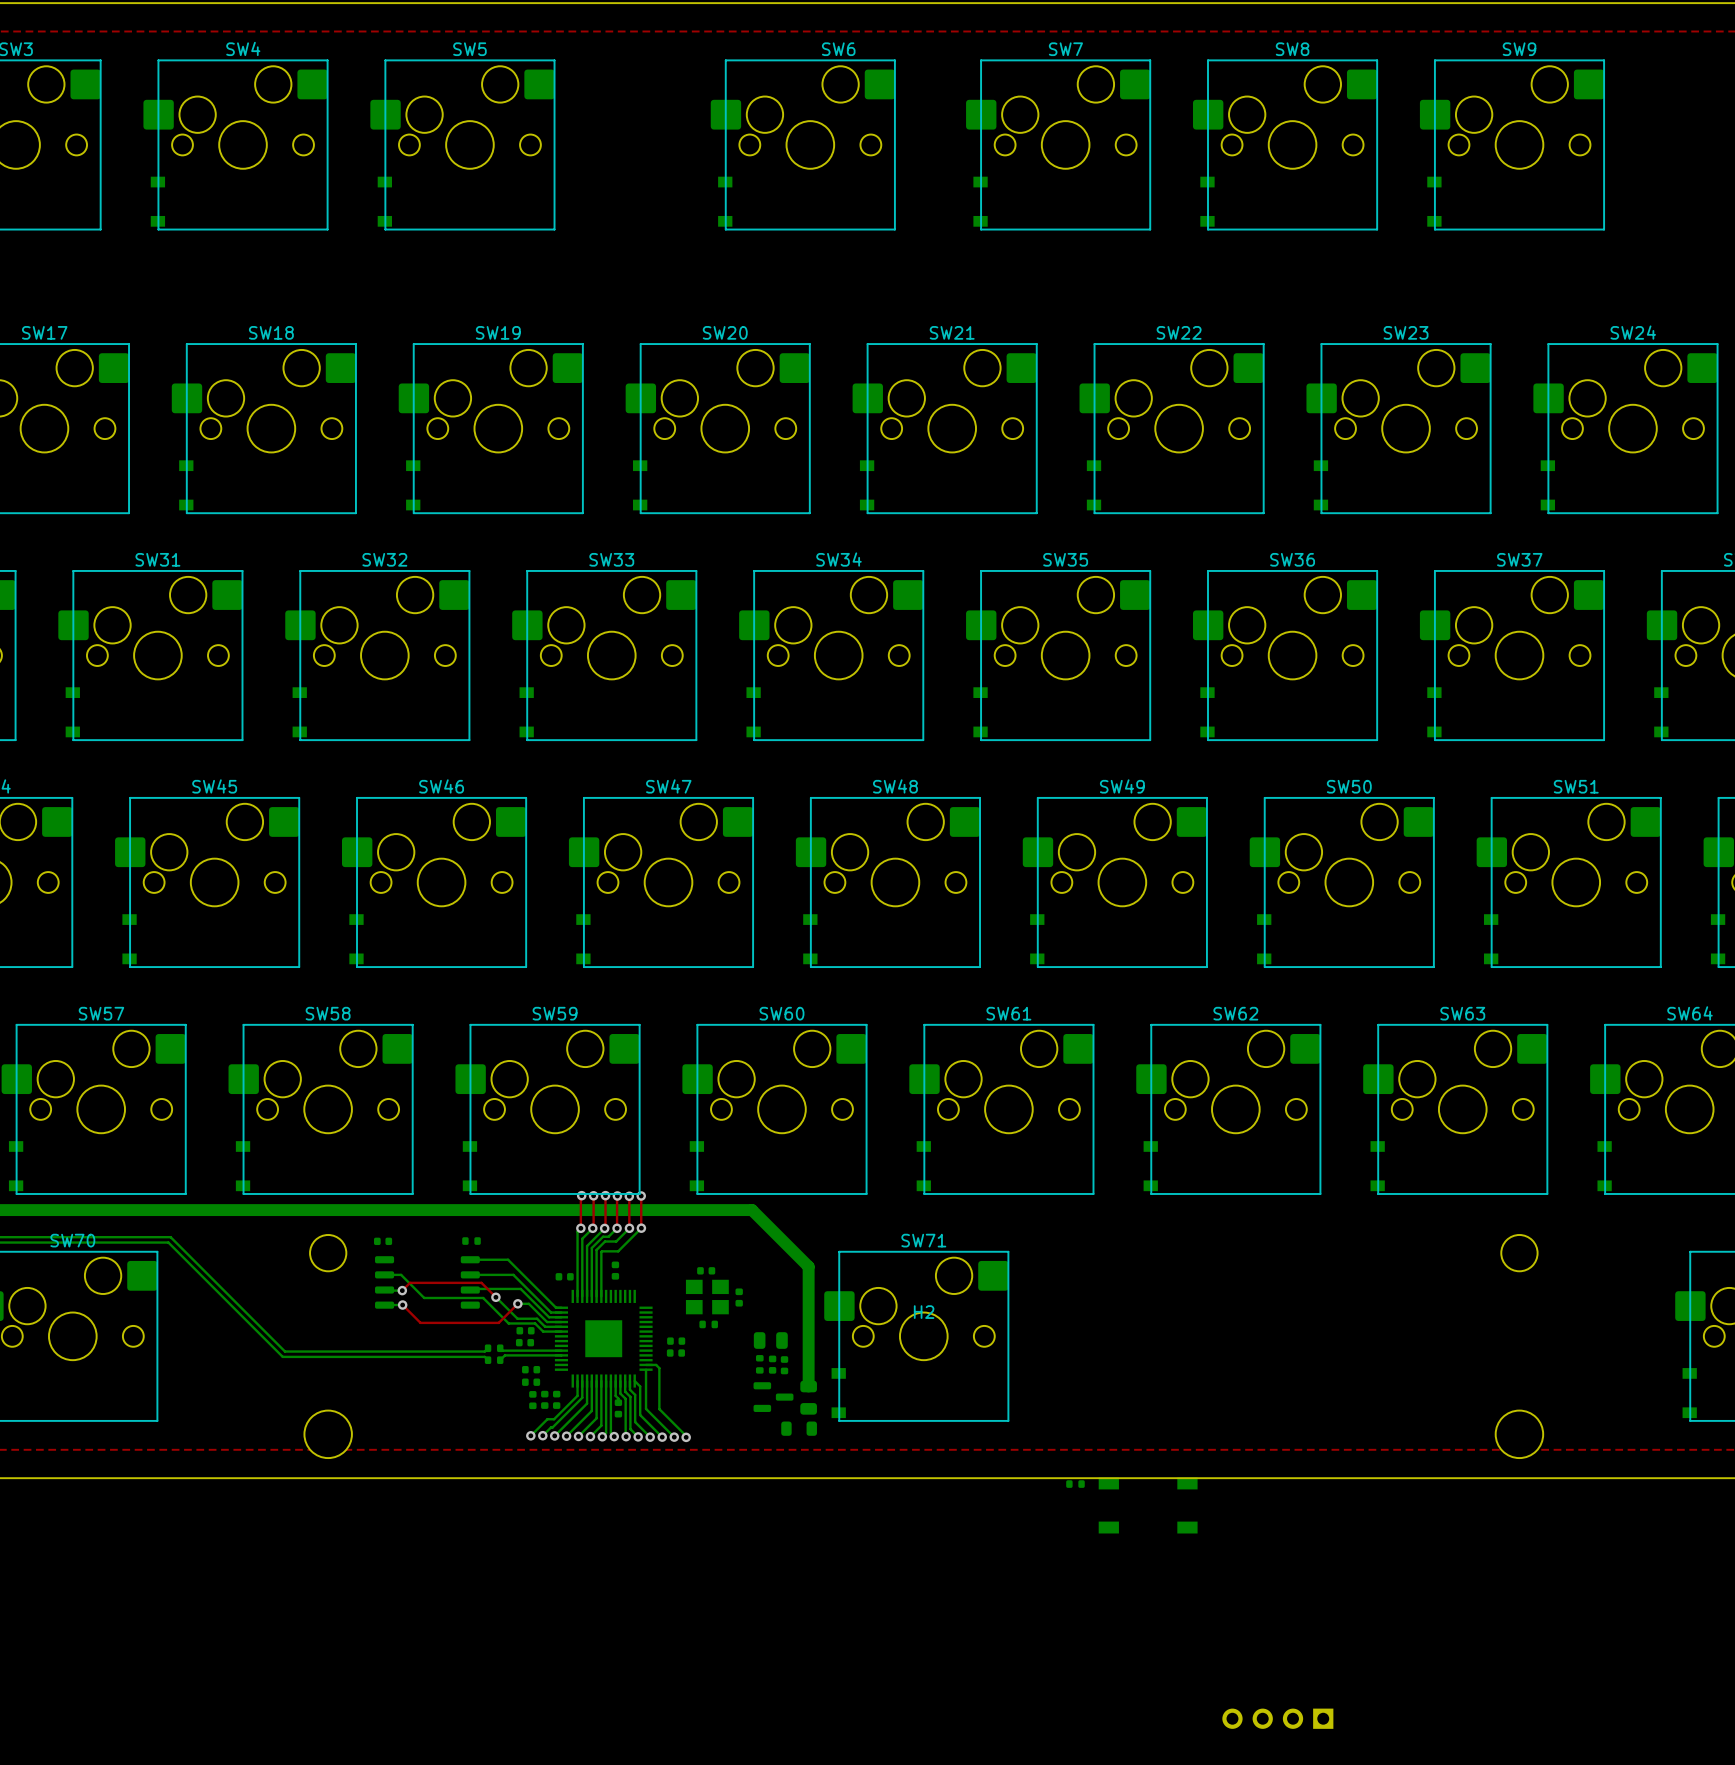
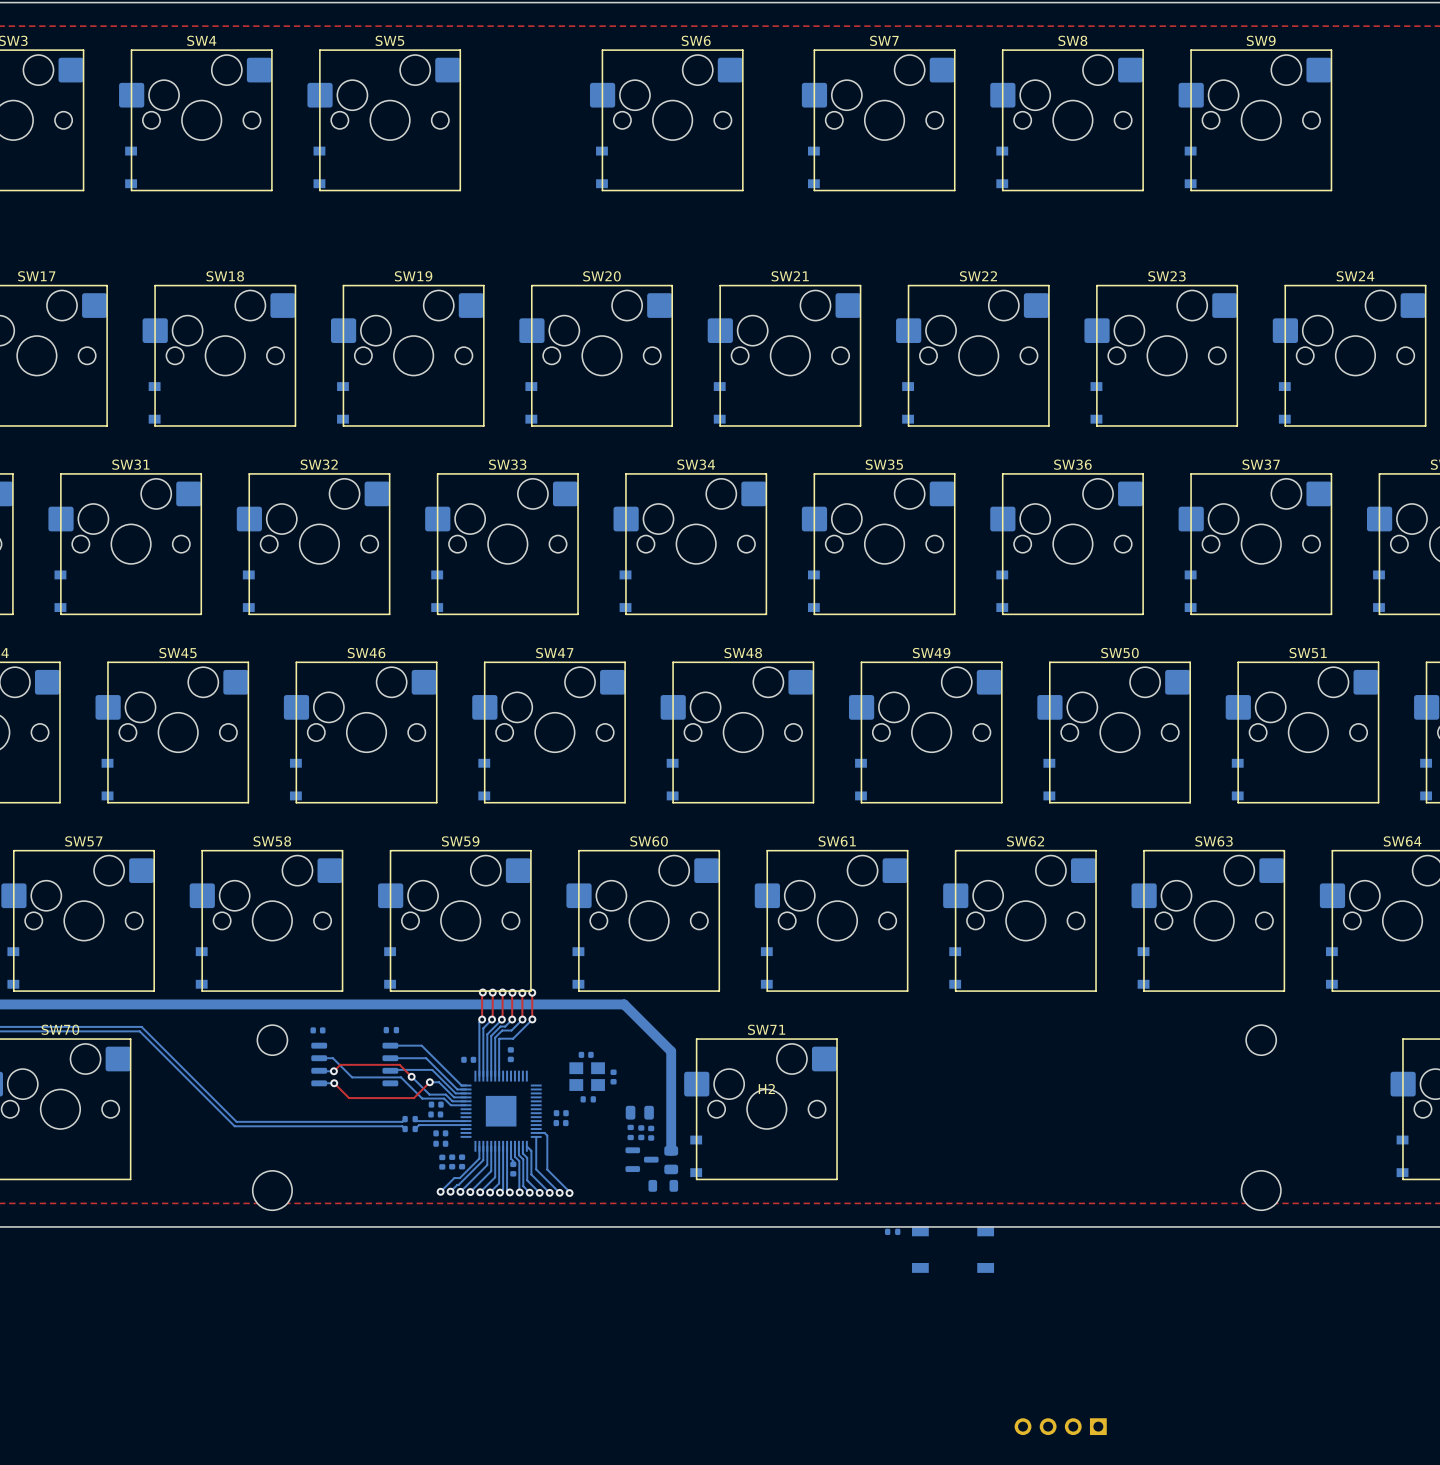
part: none -> (440, 1133)
part: (531, 1369) -> none
part: none -> (440, 1143)
part: (531, 1382) -> none

